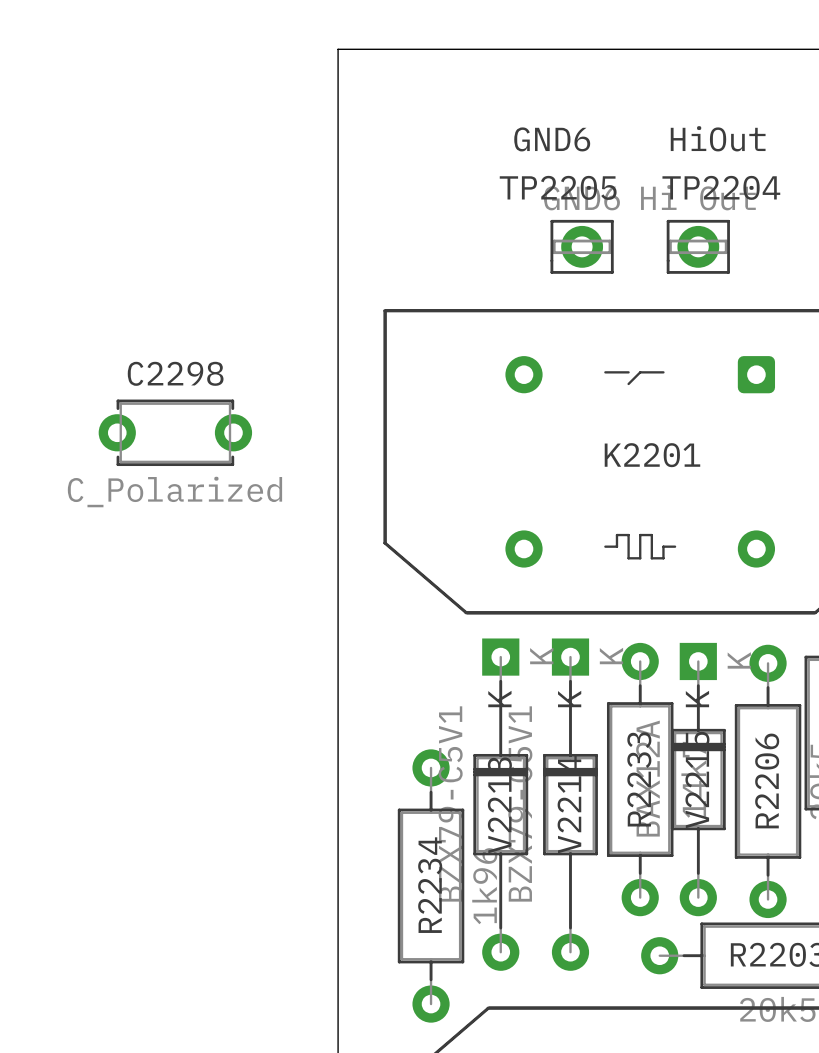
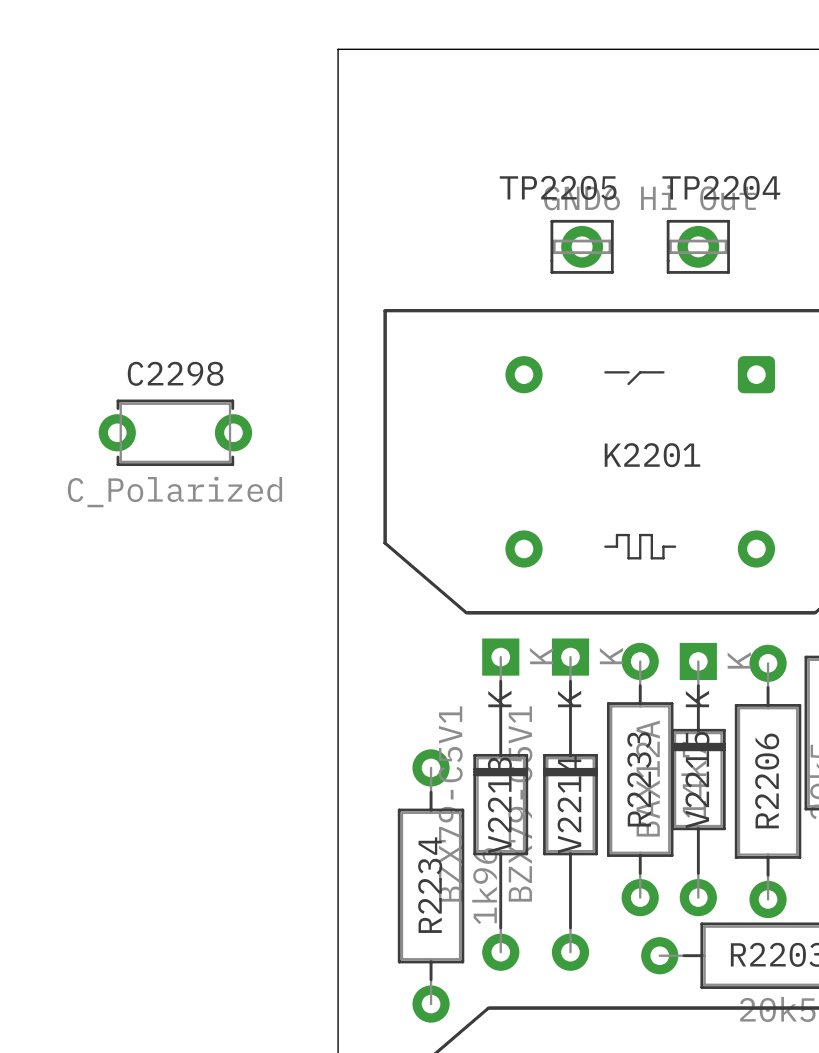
text: HiOut (718, 138) -> none
text: GND6 (552, 139) -> none

